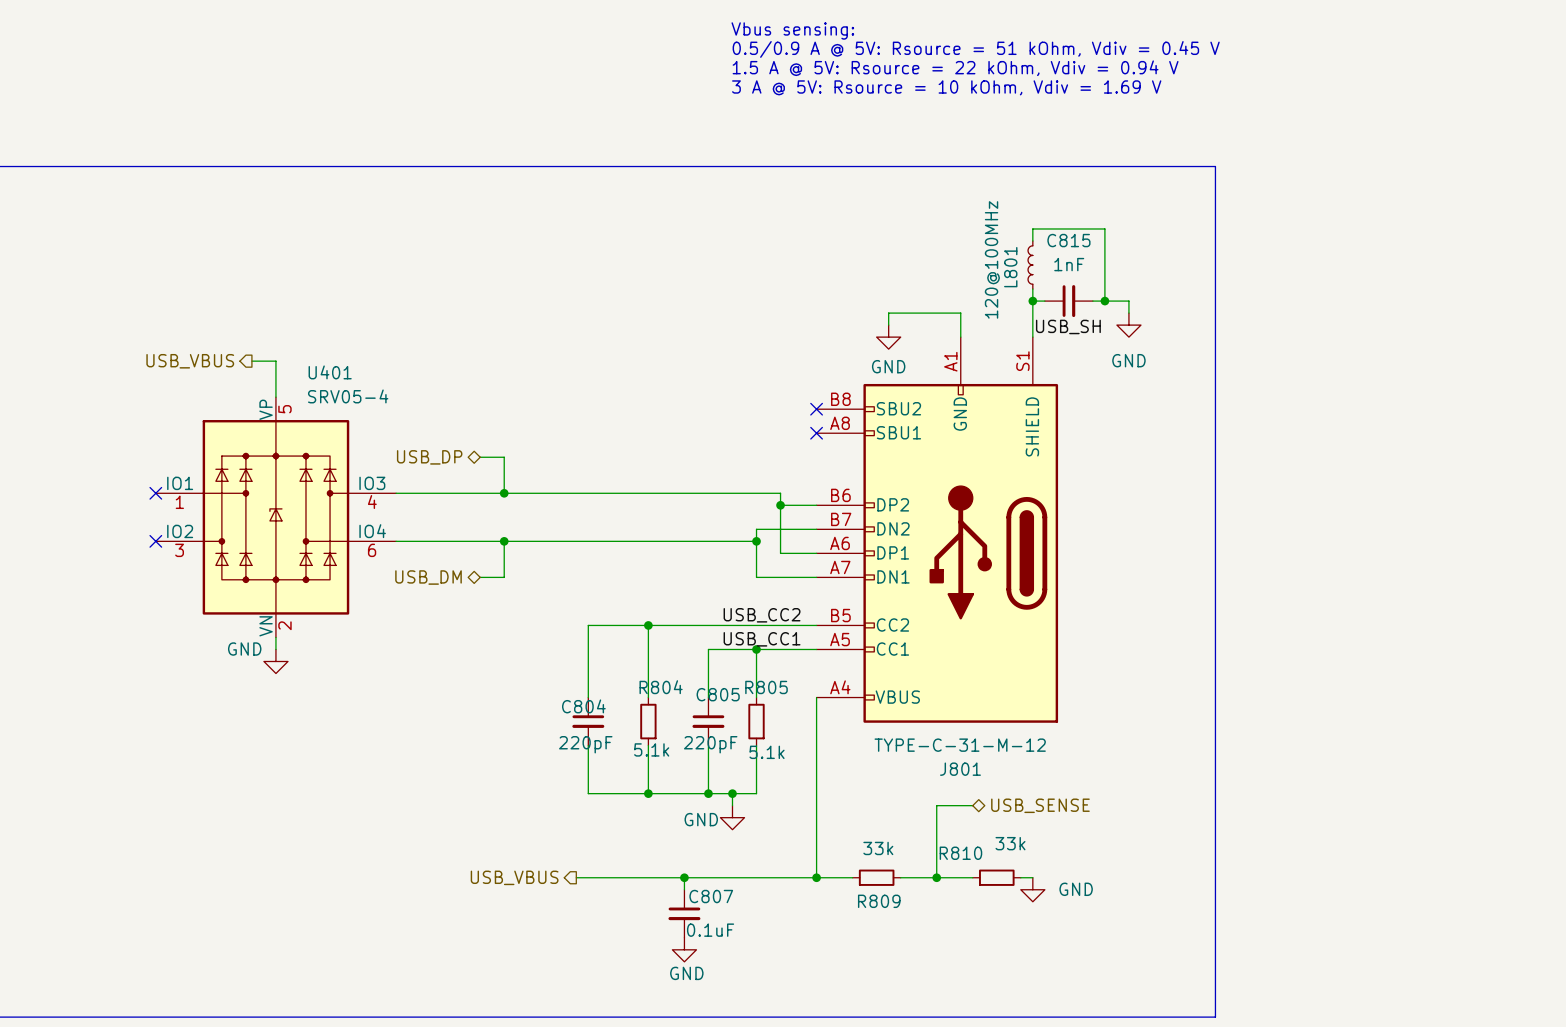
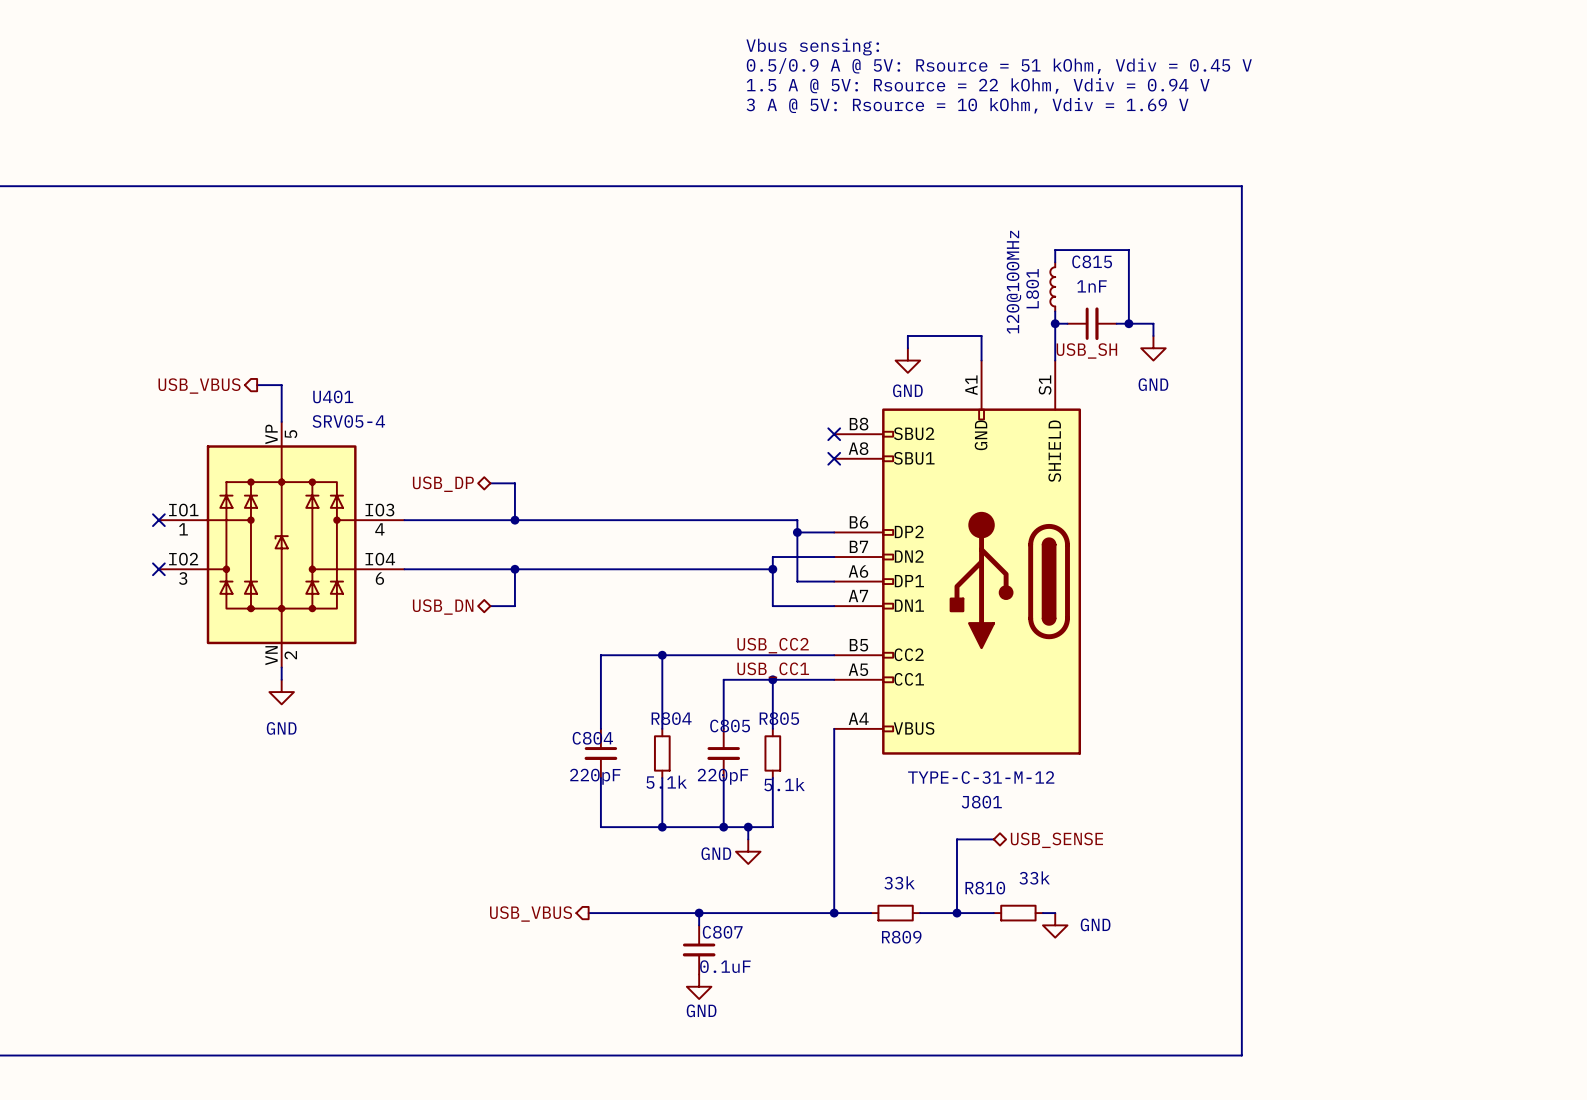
hierarchical label: USB_DM (428, 577) -> USB_DN (443, 607)
power symbol text position: GND (244, 649) -> GND (281, 728)

